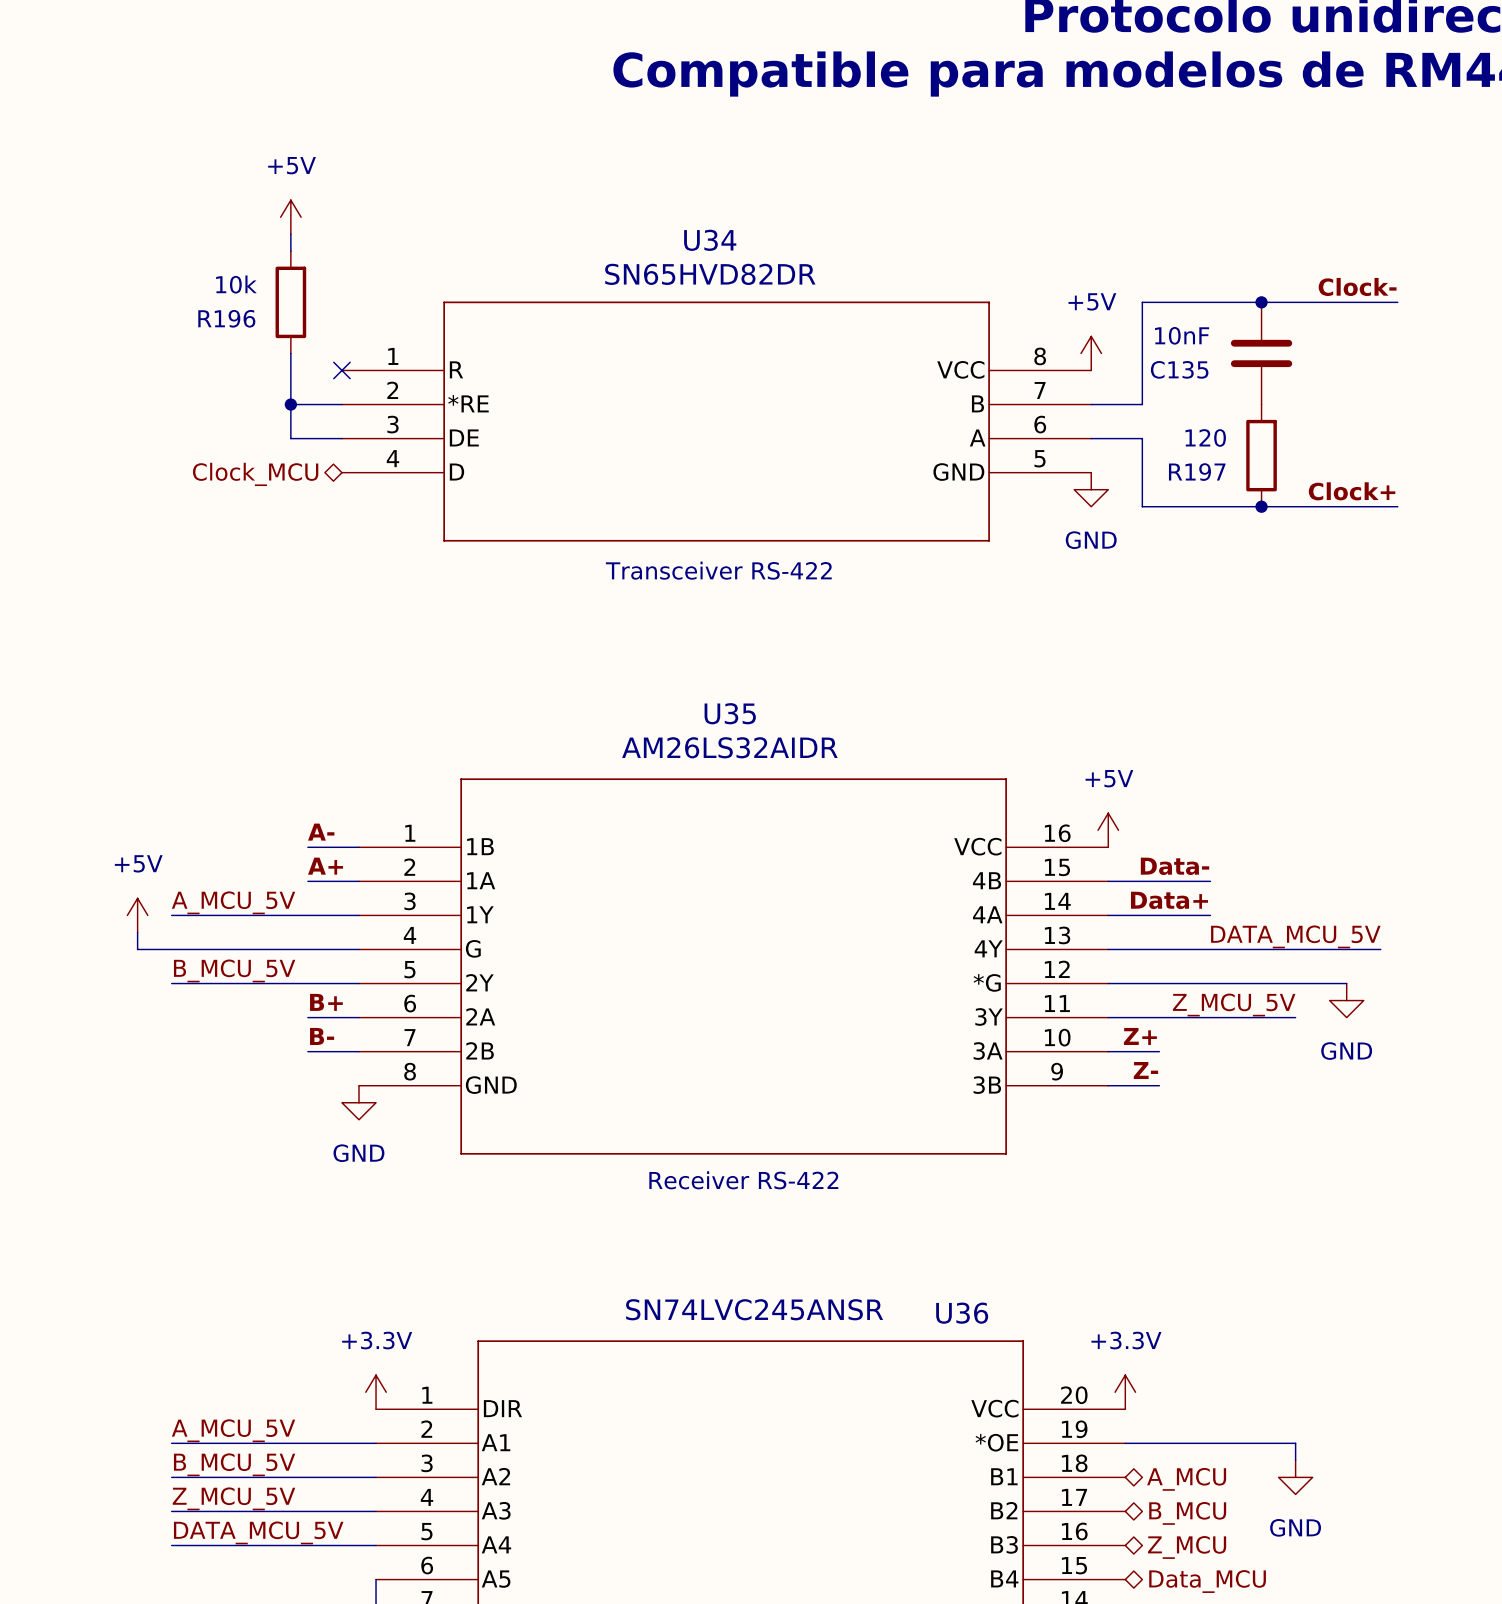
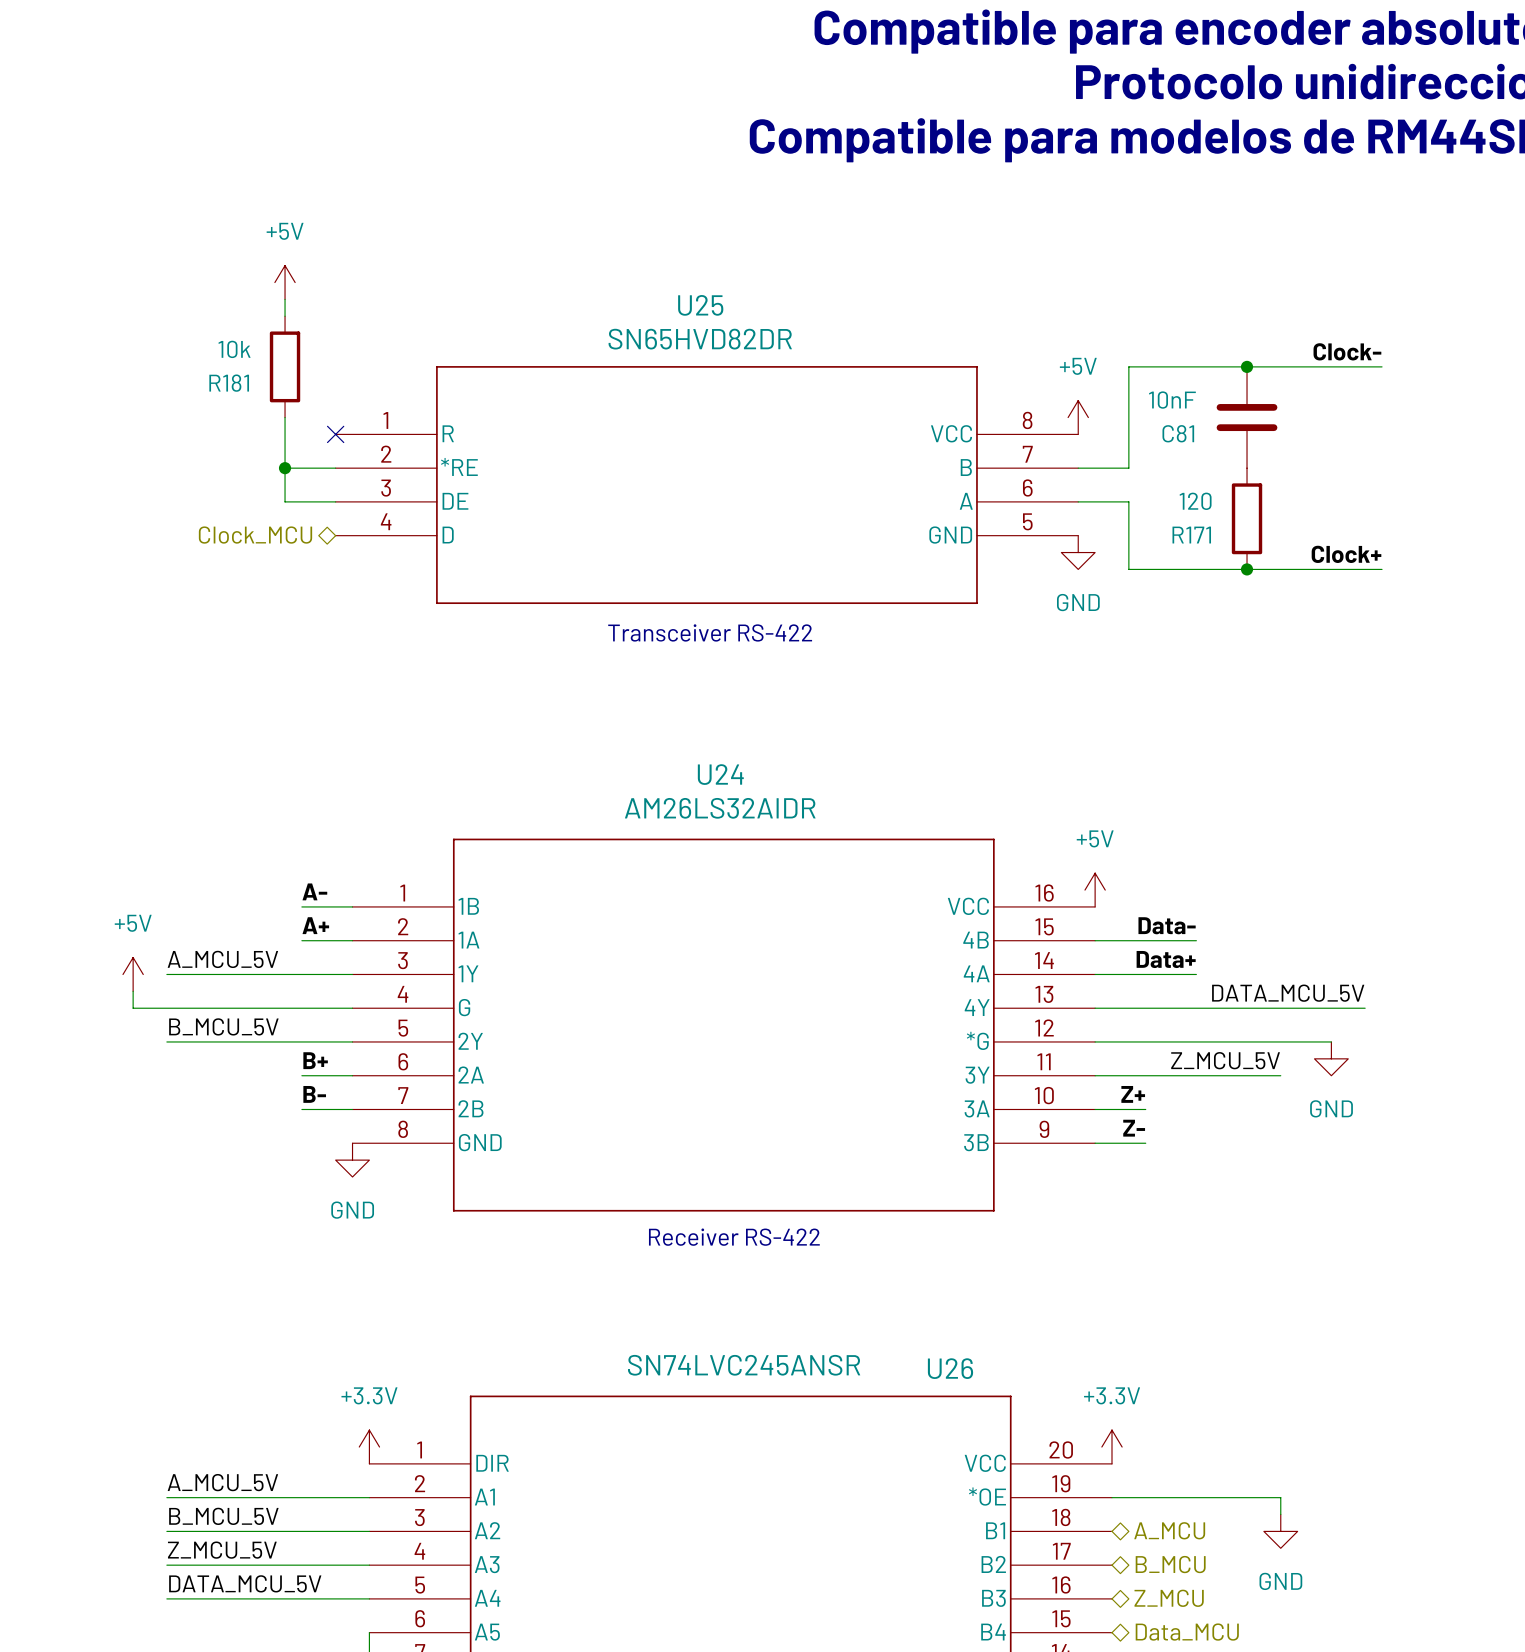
U34 name: U34 (710, 240) -> U25 (700, 305)
R196 name: R196 (226, 318) -> R181 (229, 383)
C135 name: C135 (1179, 369) -> C81 (1178, 433)
R197 name: R197 (1197, 472) -> R171 (1191, 535)
U35 name: U35 (730, 713) -> U24 (720, 774)
U36 name: U36 (962, 1313) -> U26 (950, 1368)

